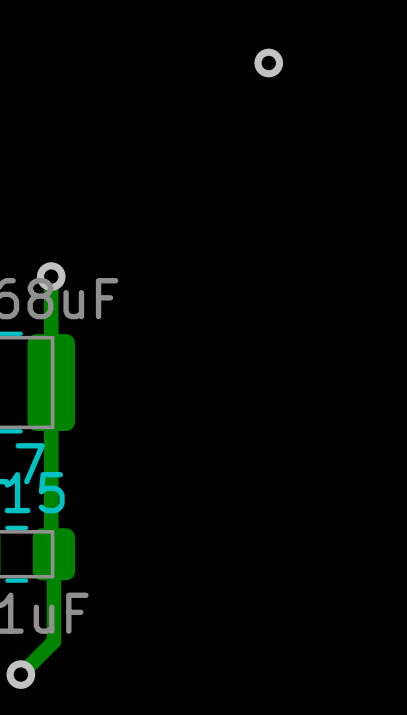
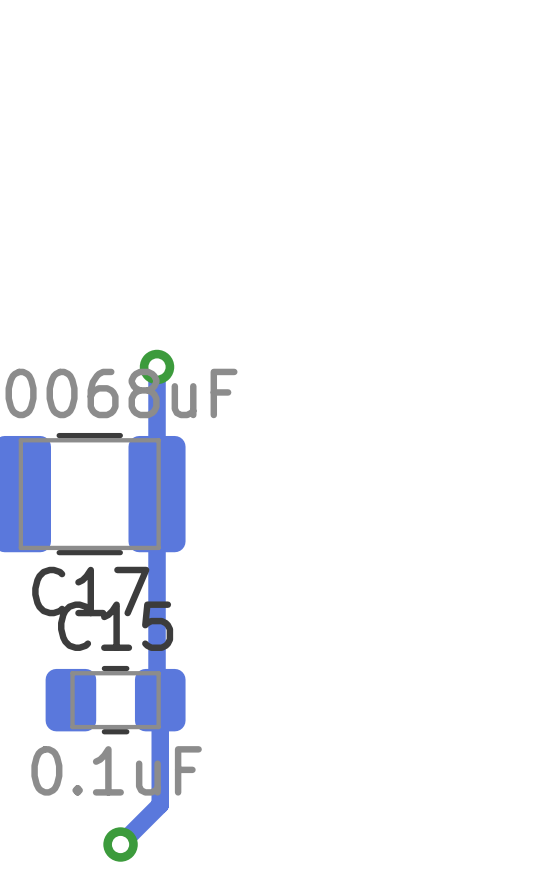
via: (268, 63) -> none

